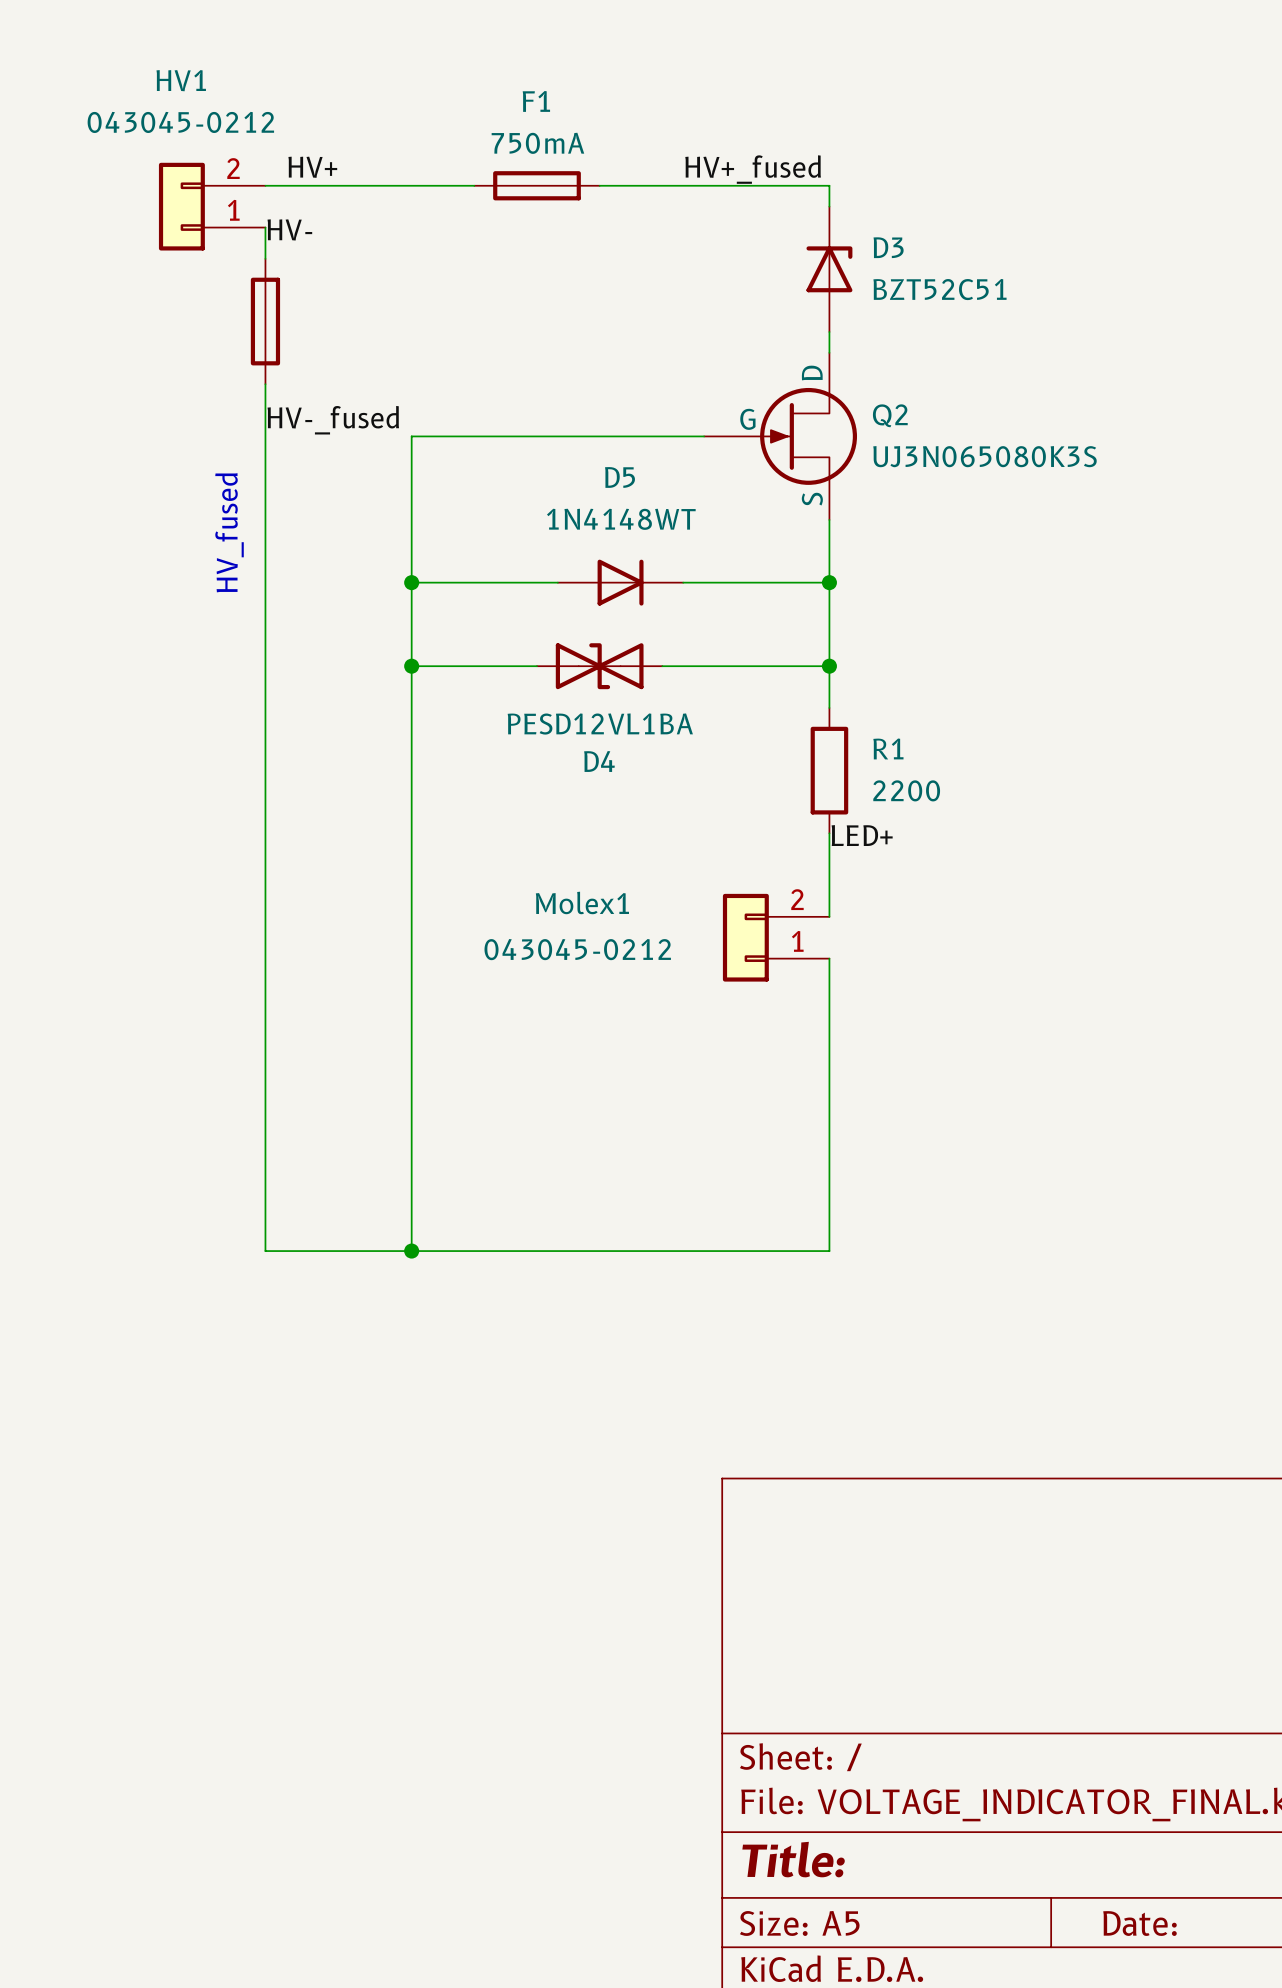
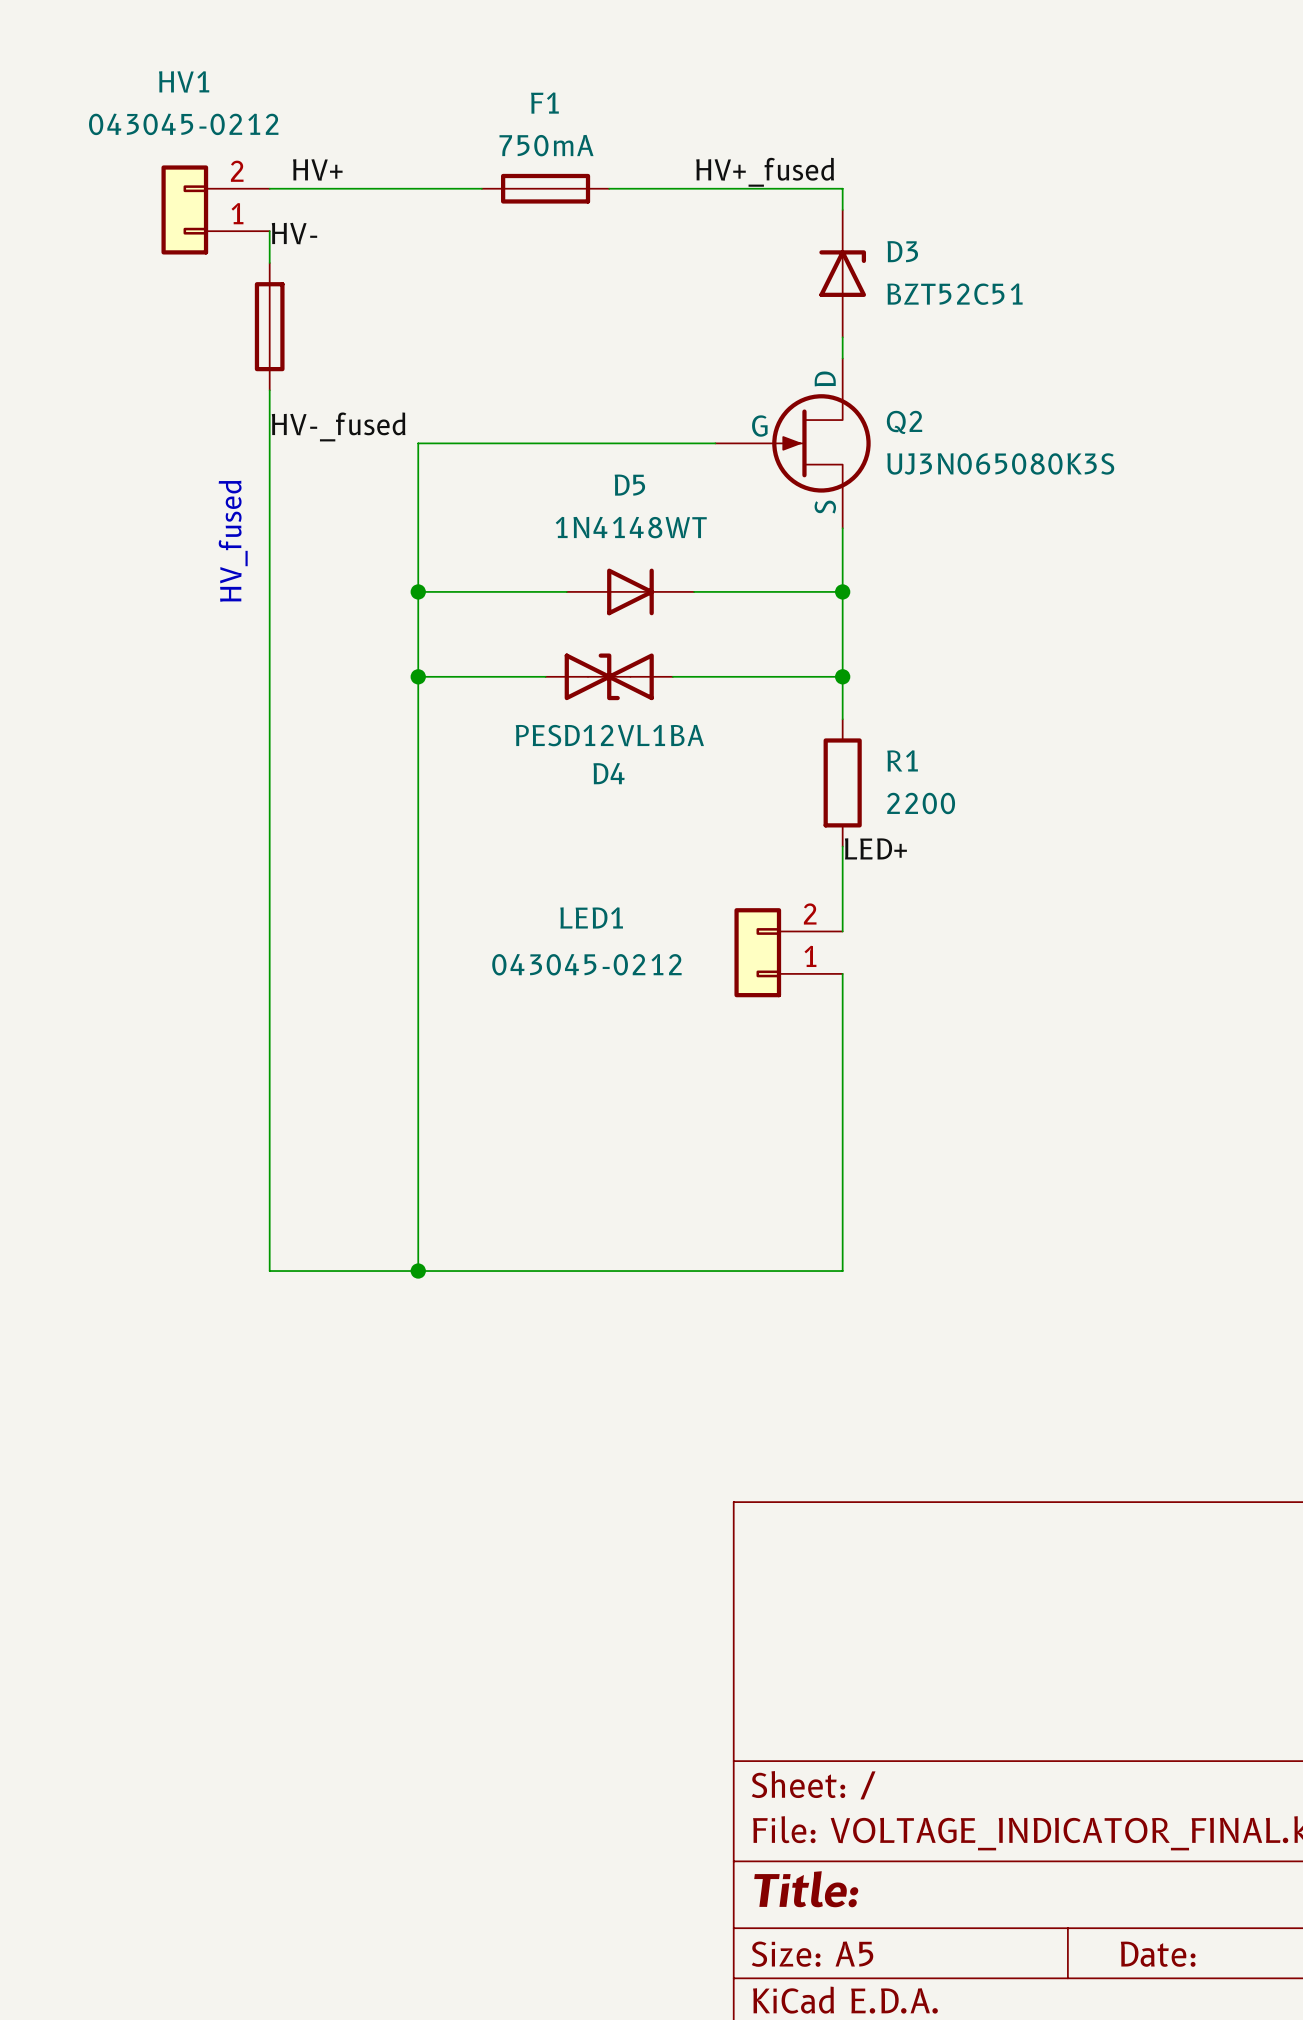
Molex1 name: Molex1 (582, 902) -> LED1 (591, 917)

